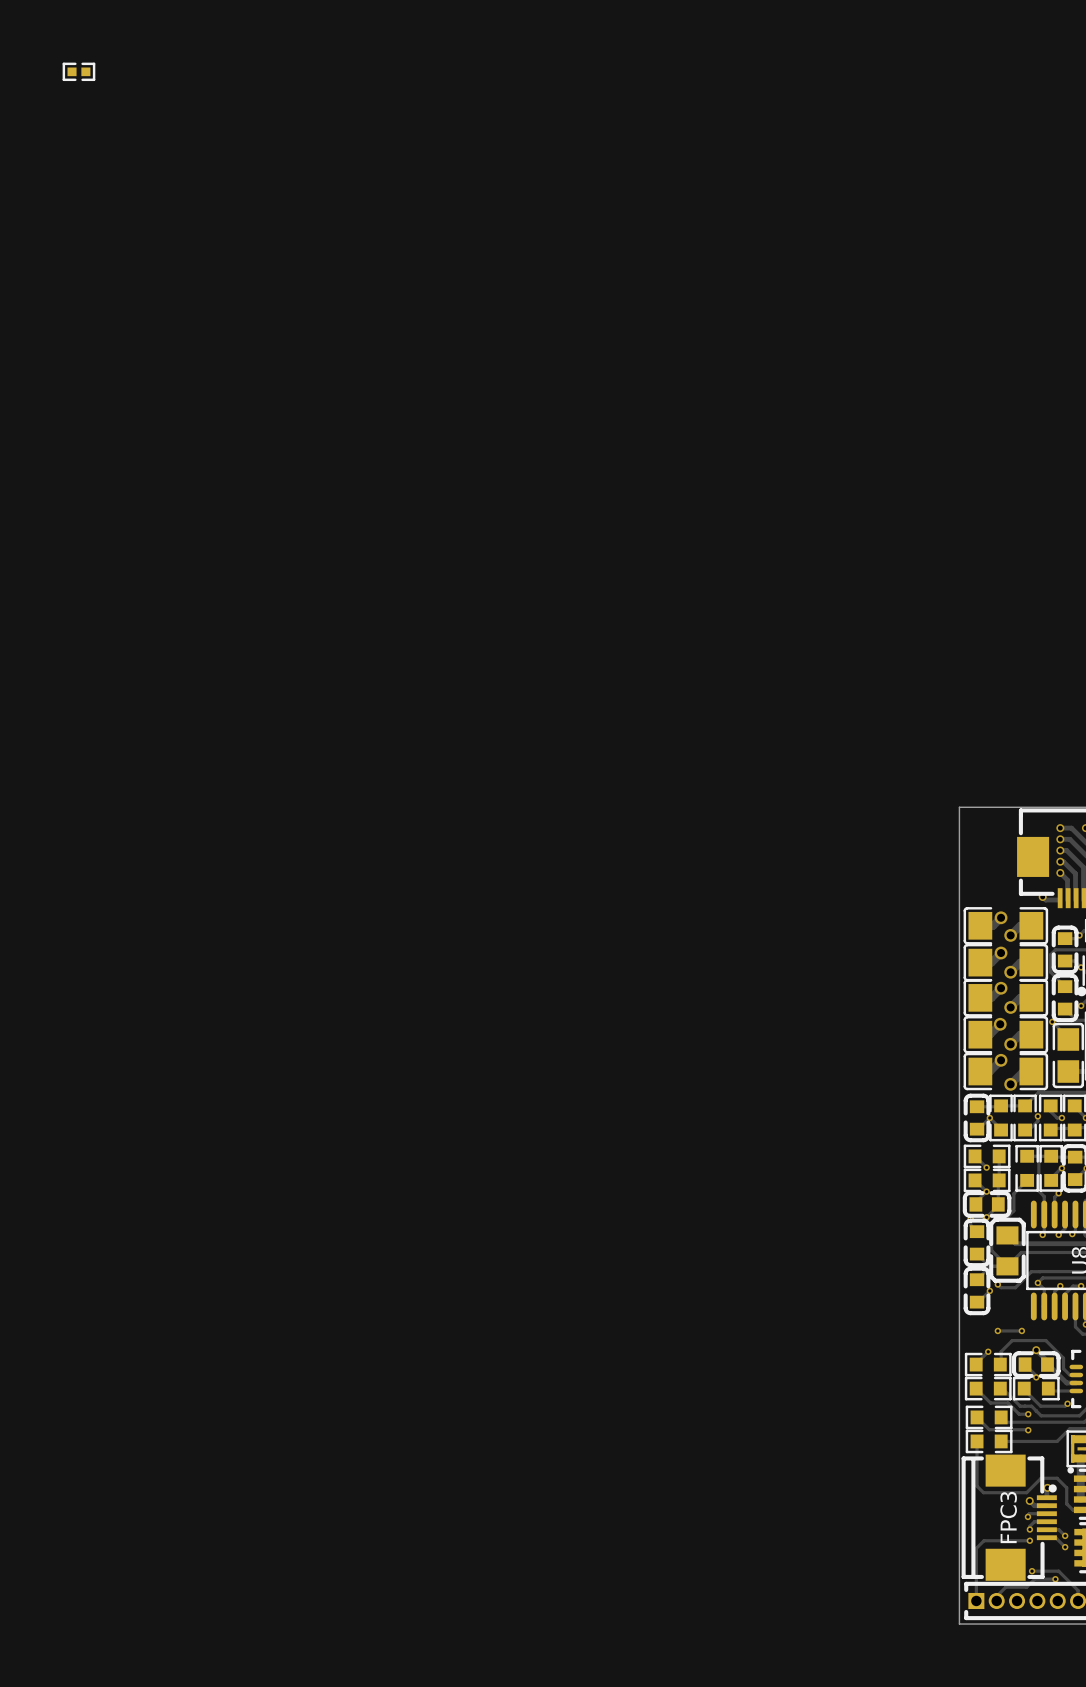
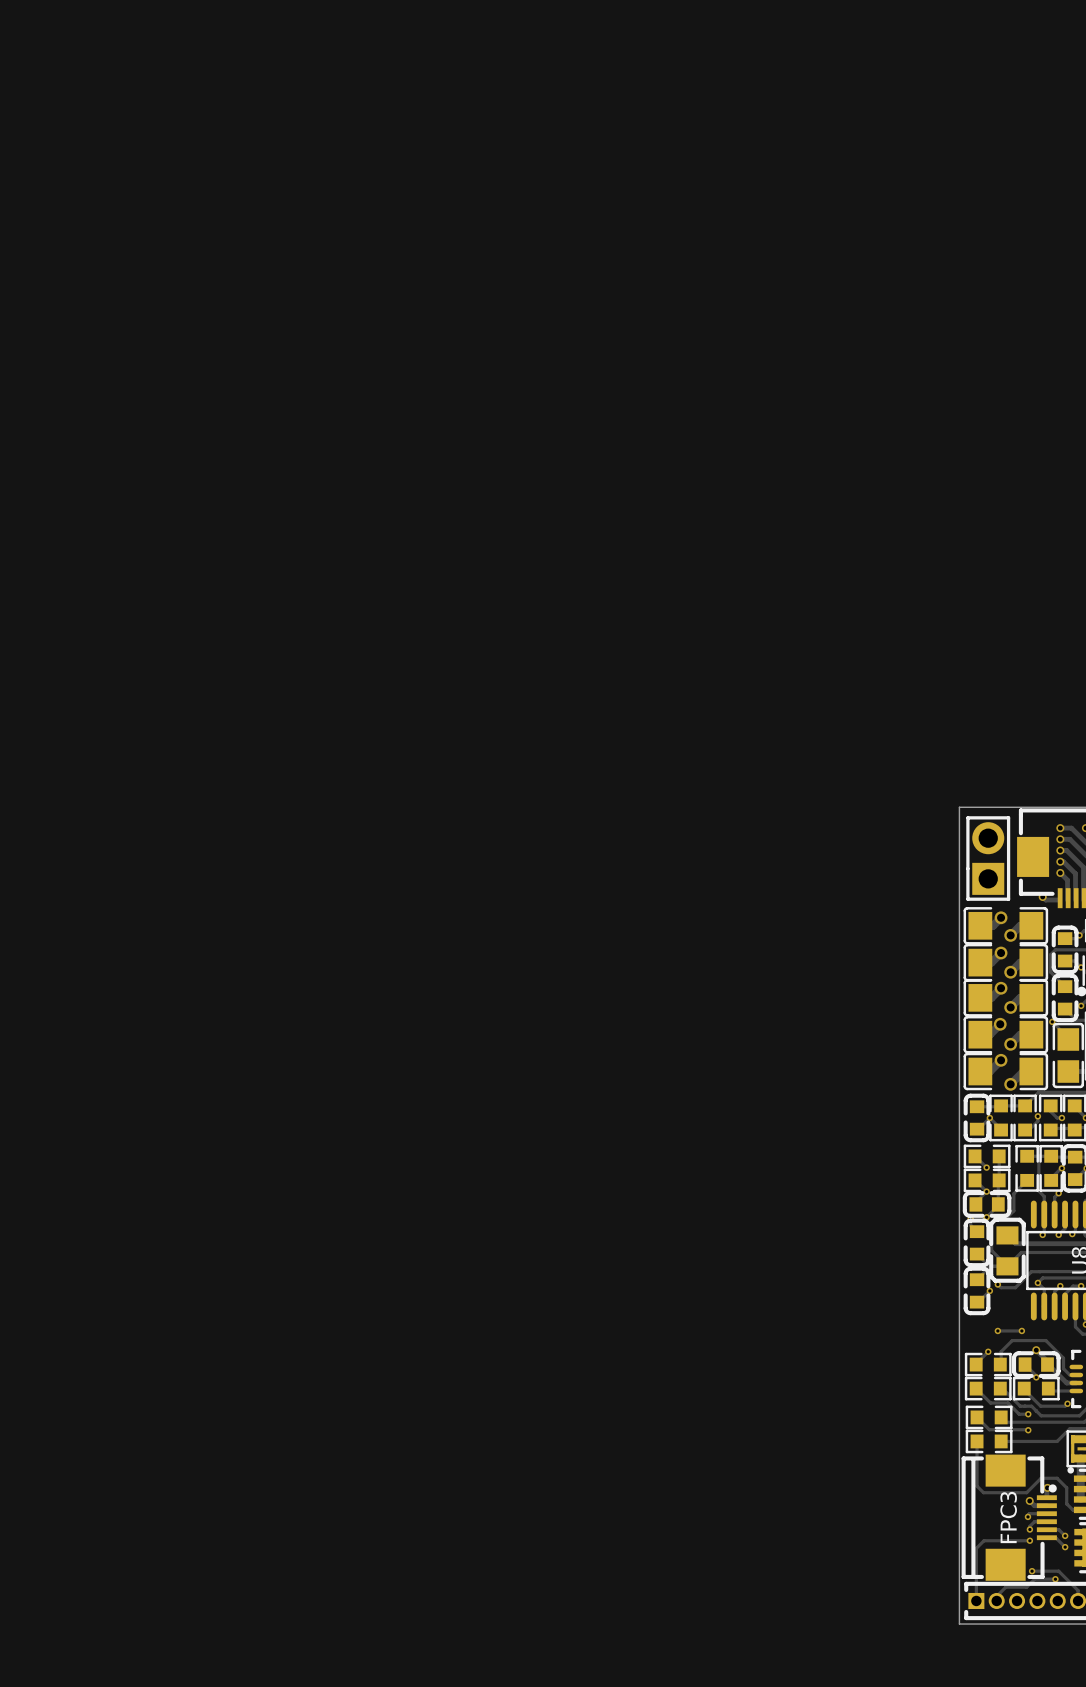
part: (78, 71) -> none
part: none -> (988, 858)

